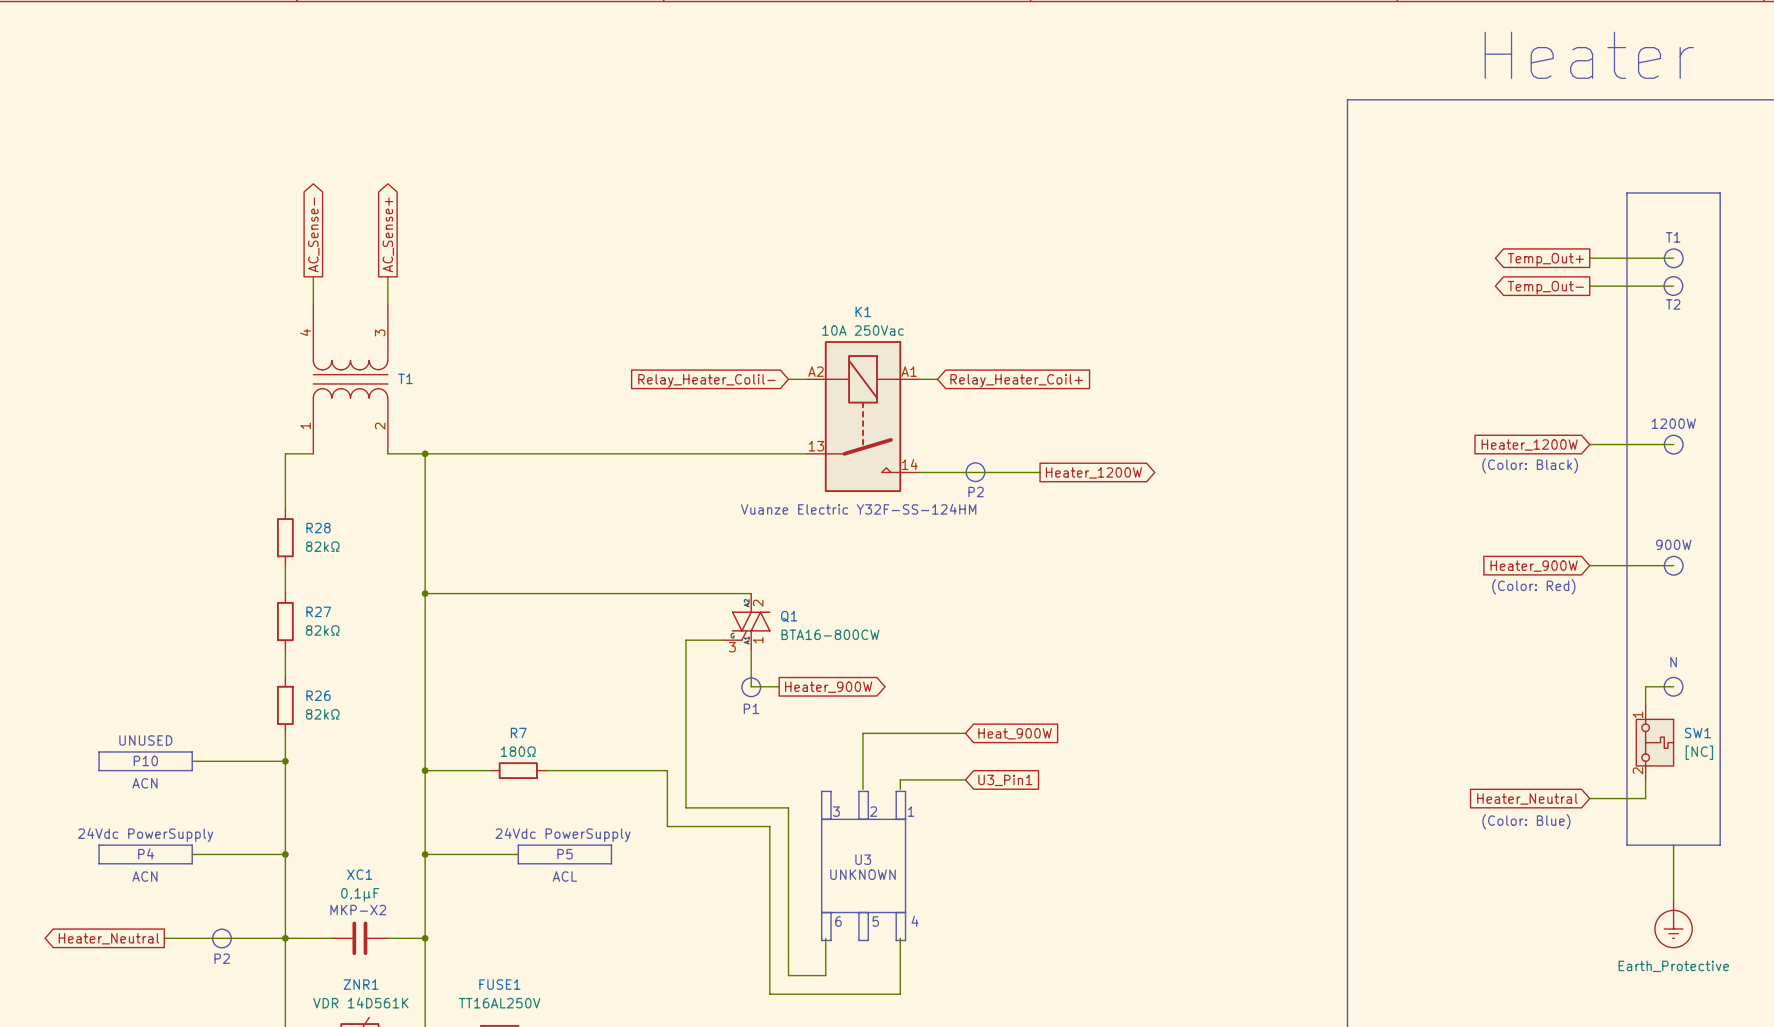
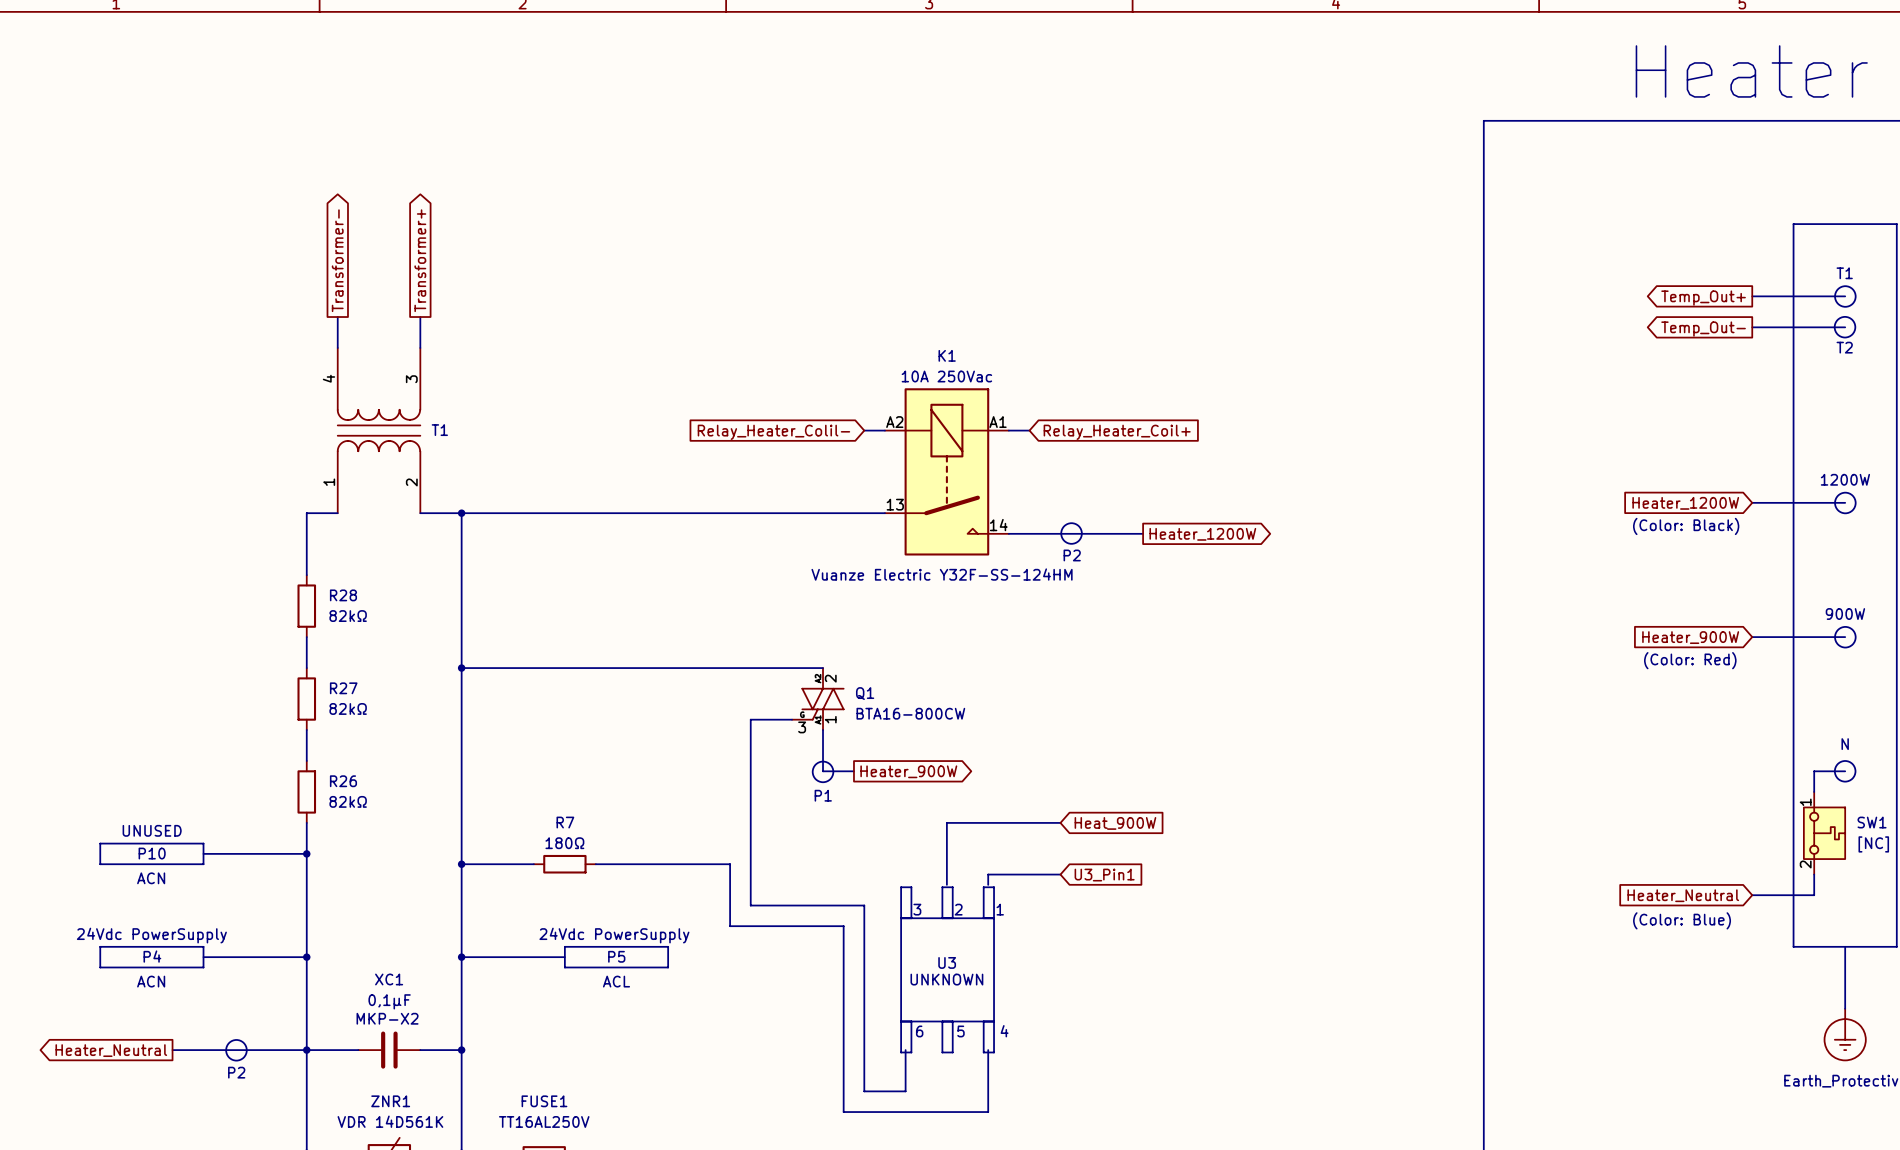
global label: AC_Sense- (313, 234) -> Transformer- (337, 260)
global label: AC_Sense+ (388, 234) -> Transformer+ (420, 260)

